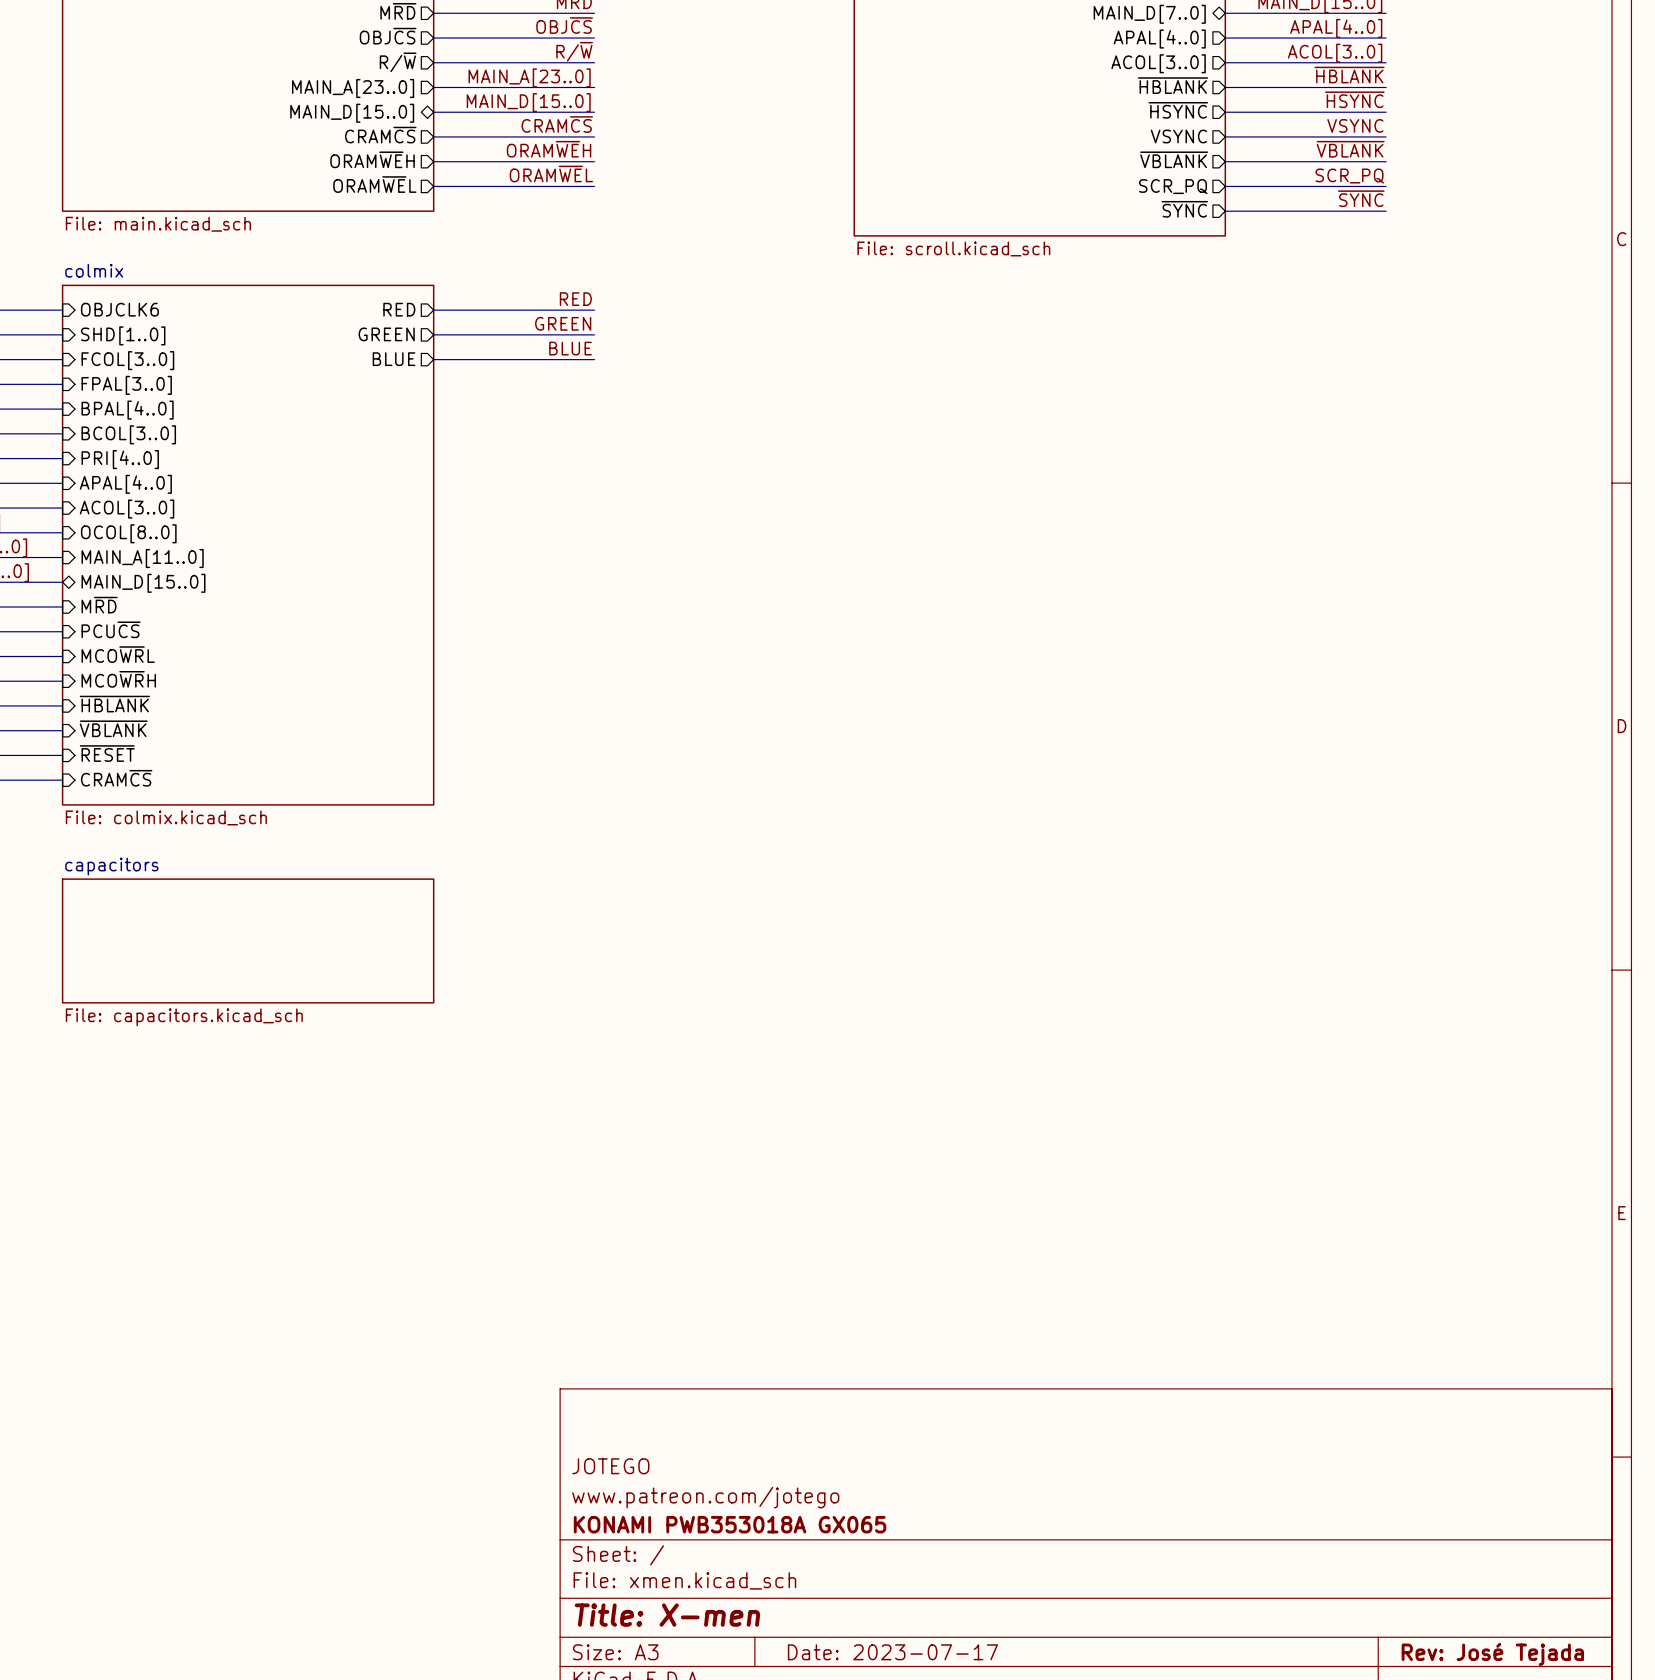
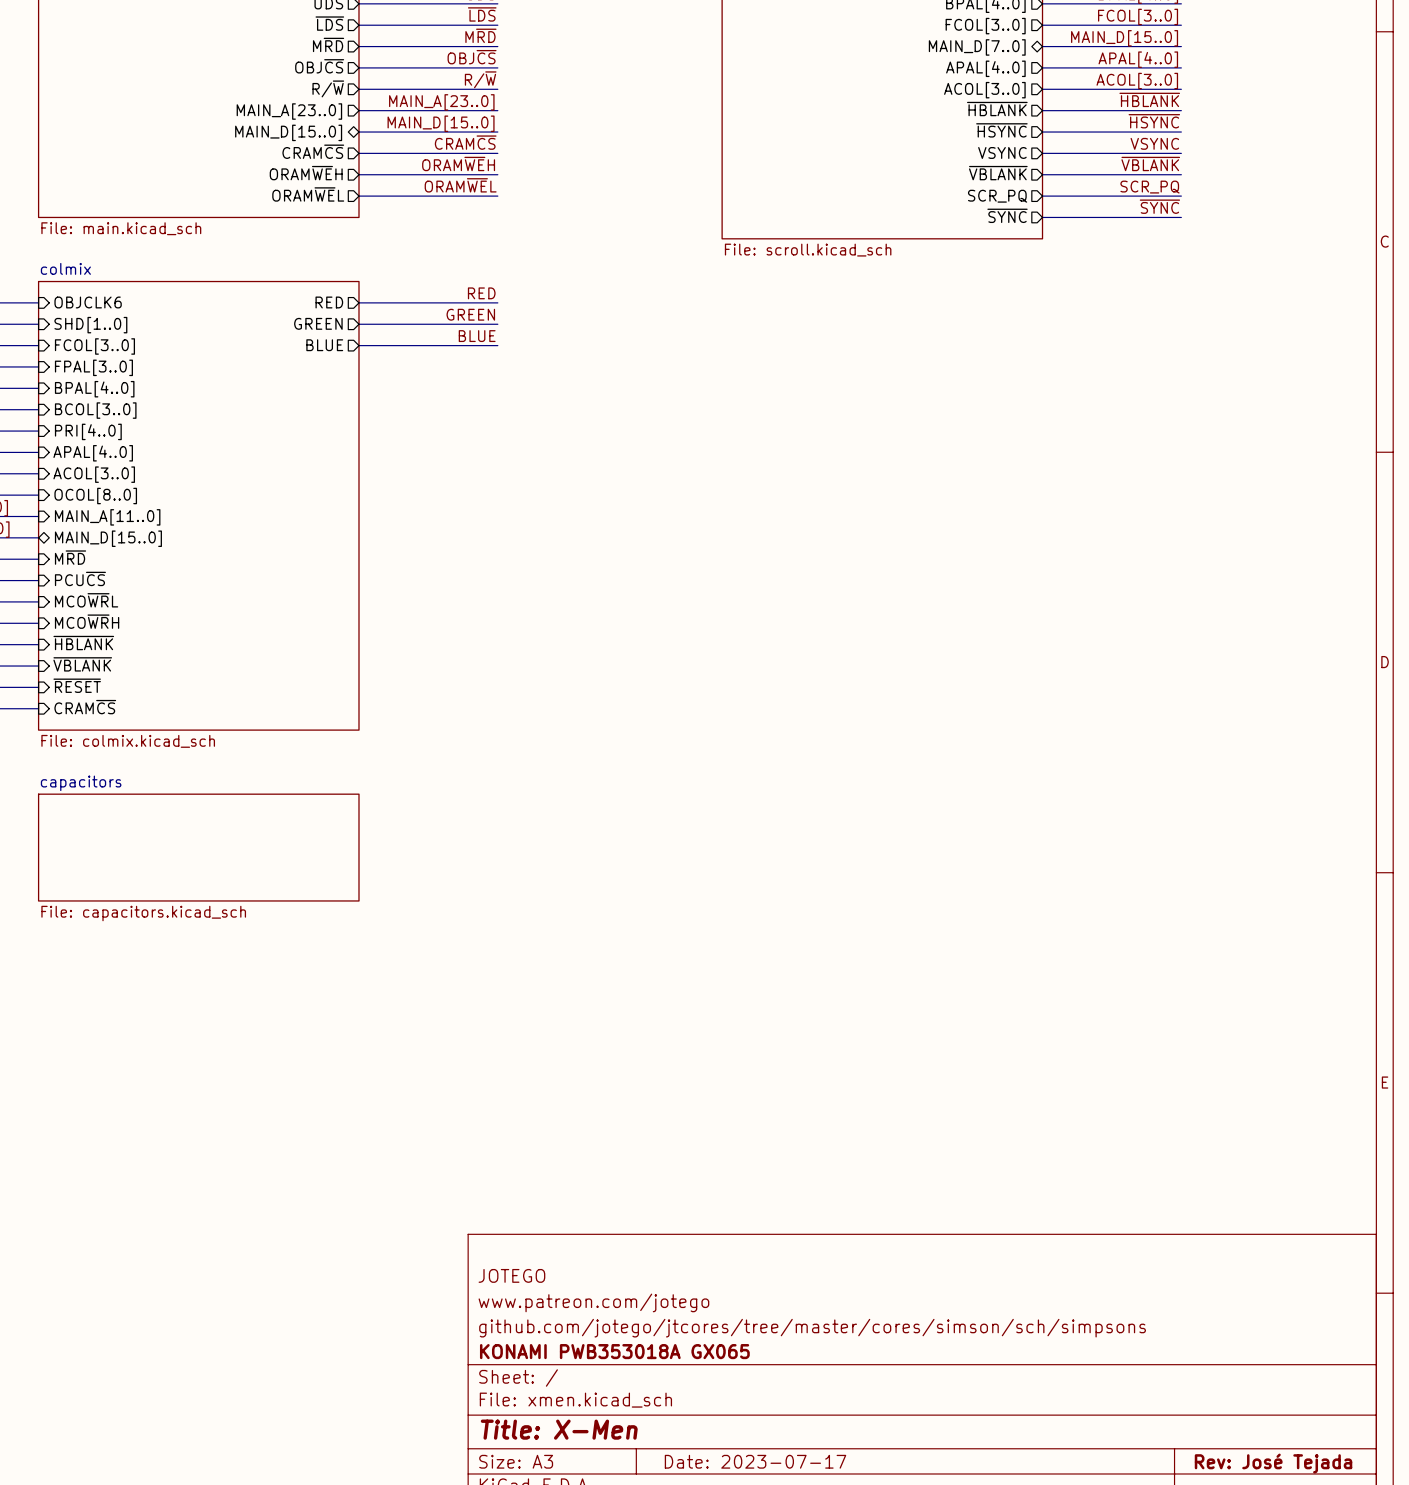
title block: none -> JOTEGO (511, 1275)
title block: JOTEGO (610, 1466) -> www.patreon.com/jotego (593, 1302)
title block: www.patreon.com/jotego (705, 1497) -> github.com/jotego/jtcores/tree/master/cores/simson/sch/simpsons (812, 1328)
title block: Title: X-men (667, 1615) -> Title: X-Men (559, 1429)

